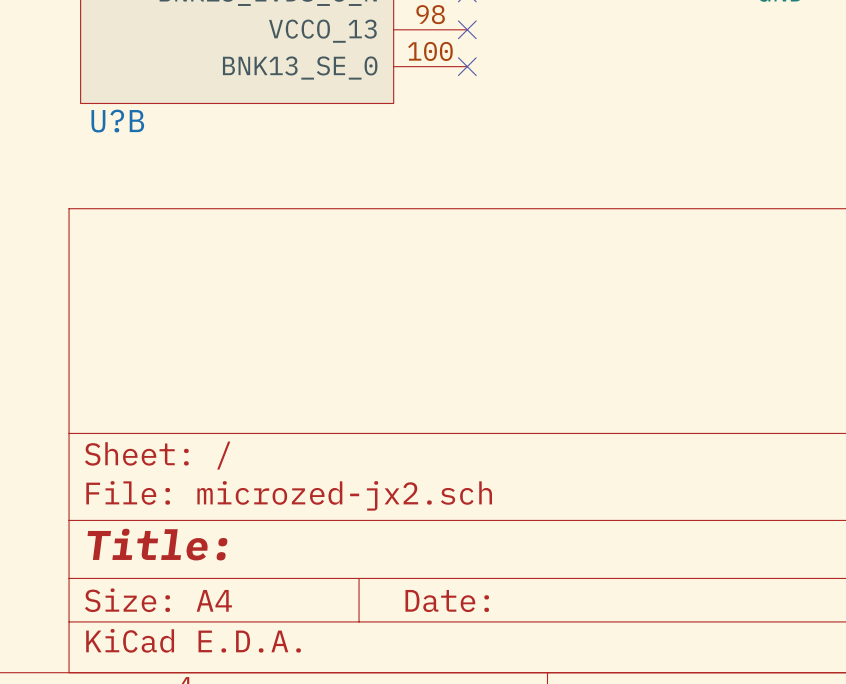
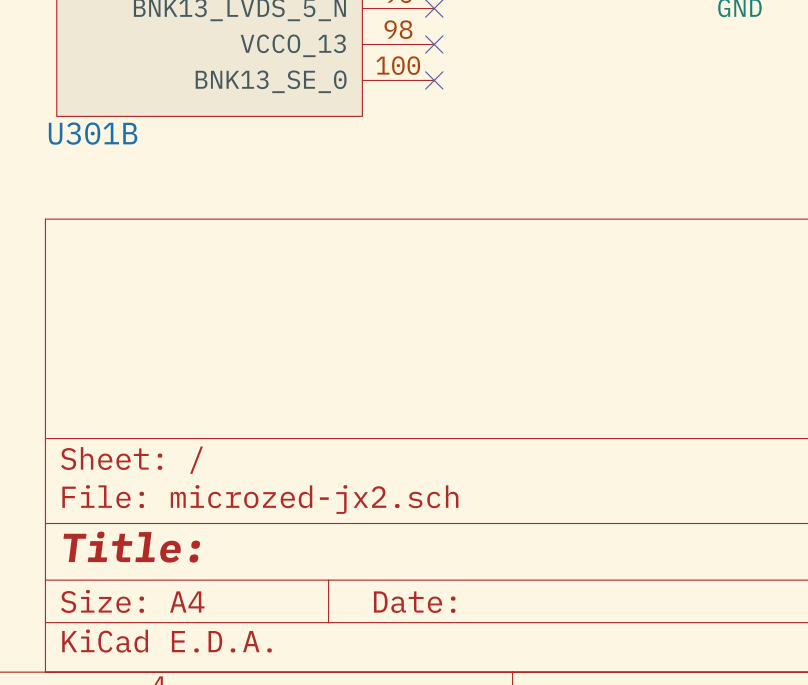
U?B name: U?B (117, 121) -> U301B (93, 133)

